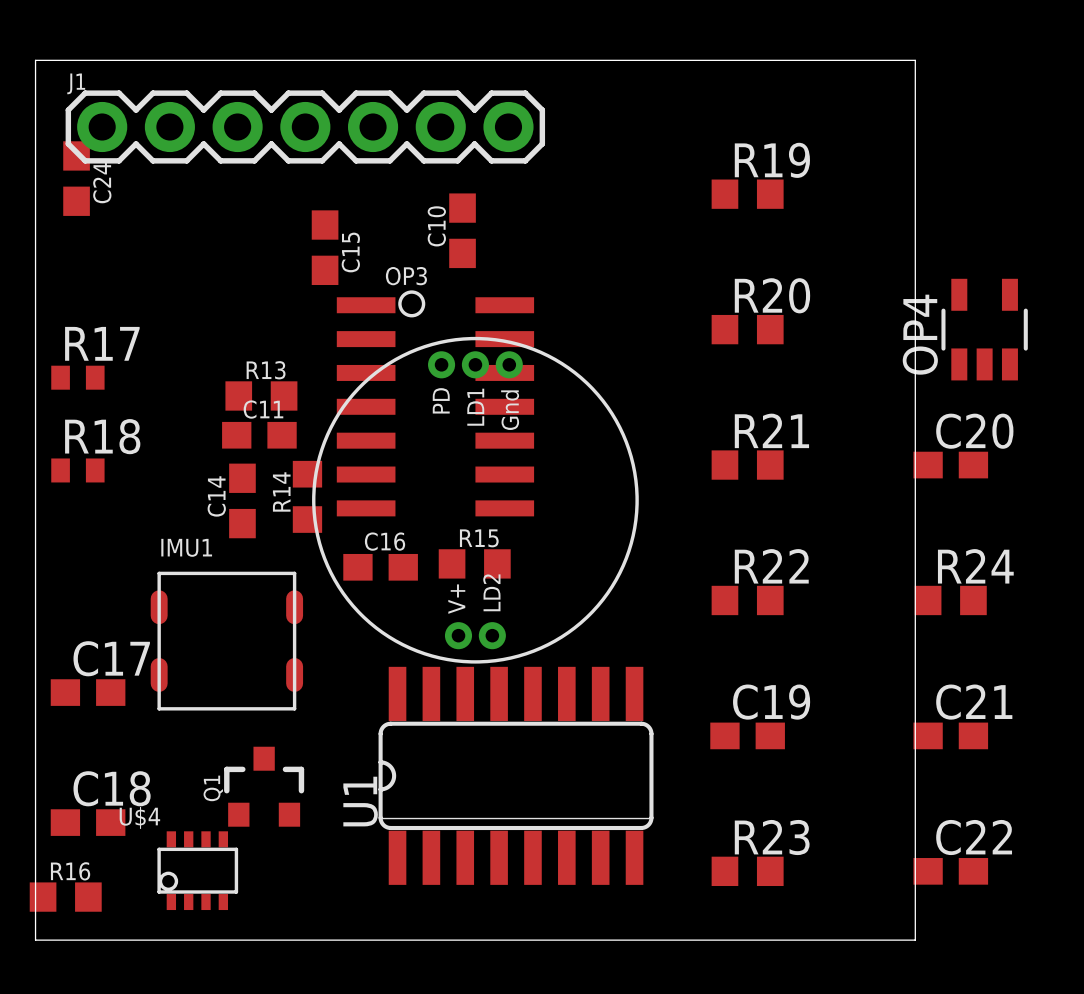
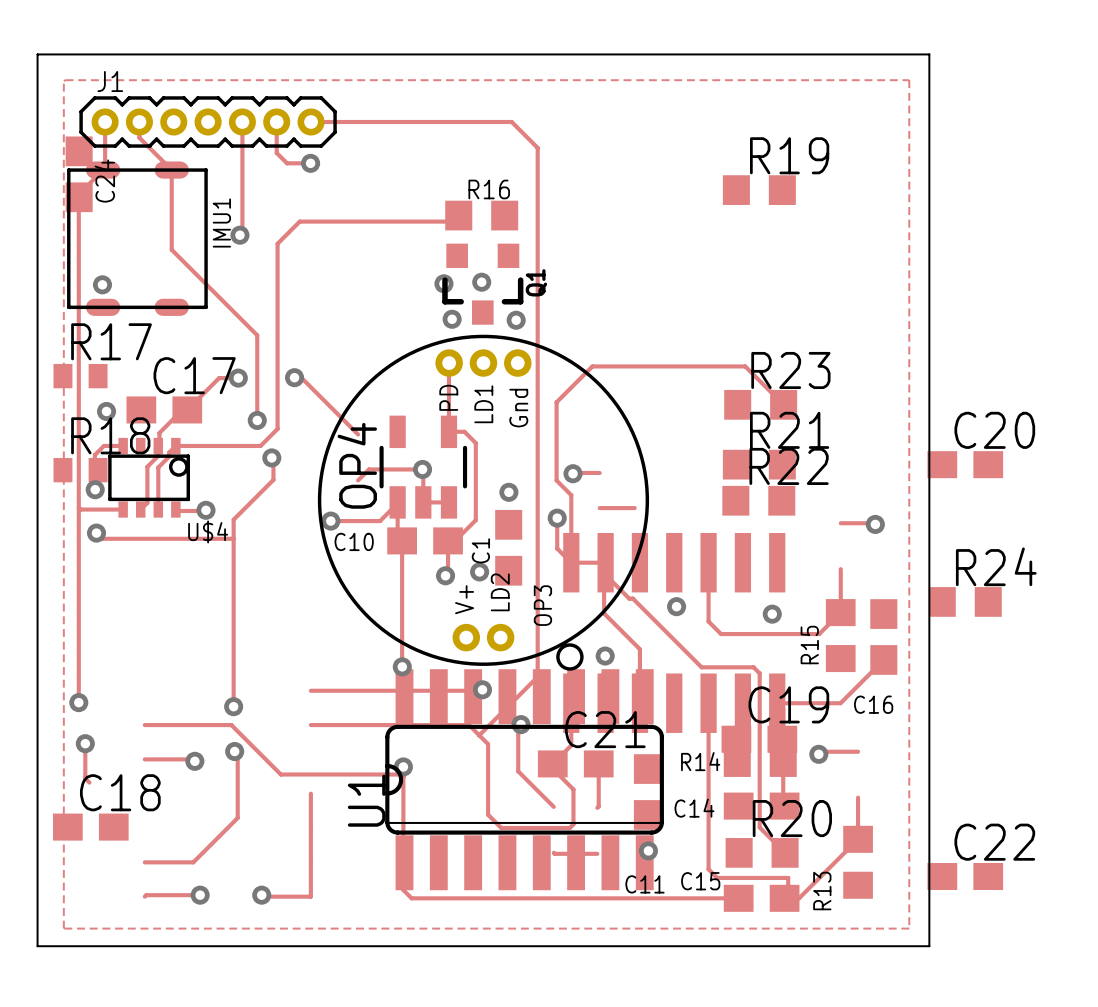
J1 name position: J1 (76, 83) -> J1 (110, 81)
zone outline: none -> (65, 80) (909, 80) (909, 928) (63, 928) (63, 80) (65, 80)
J1 footprint: [65, 90, 546, 164] -> [79, 96, 337, 148]
track: none -> (105, 122) (105, 168) (78, 194) (78, 702)
track: none -> (139, 122) (139, 137) (171, 170) (171, 249) (257, 335) (257, 420)
track: none -> (242, 122) (242, 232) (239, 235)
track: none -> (276, 122) (276, 153) (287, 163) (310, 163)
track: none -> (311, 122) (511, 122) (537, 147) (537, 676) (479, 735)
via: none -> (310, 163)
track: none -> (458, 215) (452, 221) (299, 221) (277, 243) (277, 428) (260, 445) (175, 445) (169, 452) (169, 456) (158, 467) (158, 509)
C10 rotation: 0° (462, 230) -> 90° clockwise (425, 540)
C10 position: (462, 230) -> (425, 540)
via: none -> (239, 235)
C15 rotation: 0° (325, 247) -> 90° clockwise (761, 898)
C15 position: (325, 247) -> (761, 898)
C15 name position: C15 (350, 252) -> C15 (700, 881)
via: none -> (481, 282)
via: none -> (443, 283)
via: none -> (102, 284)
via: none -> (452, 319)
via: none -> (516, 320)
R20 position: (747, 329) -> (762, 852)
OP4 position: (984, 329) -> (423, 467)
track: none -> (448, 363) (448, 431)
R13 name position: R13 (266, 370) -> R13 (822, 891)
track: none -> (238, 378) (219, 378) (187, 409) (182, 409) (159, 432) (158, 455) (147, 466) (147, 502) (140, 509)
via: none -> (238, 378)
track: none -> (294, 377) (301, 377) (358, 434)
via: none -> (294, 377)
R13 rotation: 0° (261, 395) -> 90° clockwise (858, 862)
R13 position: (261, 395) -> (858, 862)
OP3 rotation: 0° (435, 403) -> 90° counterclockwise (670, 632)
OP3 position: (435, 403) -> (670, 632)
track: none -> (783, 404) (745, 366) (592, 366) (556, 402) (556, 480) (571, 495) (571, 562)
C11 name position: C11 (263, 409) -> C11 (644, 884)
via: none -> (106, 411)
via: none -> (257, 420)
track: none -> (448, 431) (464, 431) (475, 443) (475, 520) (455, 540) (448, 540) (448, 573) (445, 575)
C11 rotation: 0° (259, 435) -> 90° clockwise (647, 792)
C11 position: (259, 435) -> (647, 792)
track: none -> (123, 445) (103, 445) (94, 455) (94, 489)
track: none -> (271, 457) (273, 459) (273, 479) (233, 519) (233, 706)
via: none -> (271, 457)
via: none -> (422, 469)
via: none -> (573, 473)
track: none -> (599, 472) (573, 473)
track: none -> (358, 480) (369, 469) (422, 469) (423, 502) (448, 502)
via: none -> (95, 489)
via: none -> (508, 492)
R14 rotation: 0° (307, 496) -> 90° clockwise (760, 762)
R14 position: (307, 496) -> (760, 762)
C14 rotation: 0° (242, 500) -> 90° clockwise (761, 806)
C14 position: (242, 500) -> (761, 806)
track: none -> (397, 502) (397, 536) (402, 540) (402, 666)
track: none -> (397, 503) (380, 521) (330, 521)
track: none -> (78, 507) (80, 509) (123, 509)
track: none -> (599, 508) (634, 508)
track: none -> (175, 509) (205, 510)
via: none -> (205, 510)
track: none -> (557, 518) (557, 548) (571, 562)
via: none -> (557, 518)
via: none -> (330, 521)
track: none -> (840, 523) (875, 524)
via: none -> (875, 524)
track: none -> (96, 533) (102, 538) (233, 538)
via: none -> (96, 533)
C16 name position: C16 (385, 541) -> C16 (873, 704)
C1: none -> (508, 547)
track: none -> (571, 562) (603, 562) (605, 565) (604, 613) (639, 649) (639, 703)
track: none -> (605, 562) (605, 574) (629, 598) (632, 598) (701, 667) (753, 667) (759, 673) (759, 827) (785, 852)
track: none -> (708, 562) (708, 621) (721, 634) (819, 634) (840, 612) (840, 569)
R15 rotation: 0° (474, 563) -> 90° clockwise (840, 635)
R15 position: (474, 563) -> (840, 635)
C16 rotation: 0° (380, 567) -> 90° clockwise (883, 637)
C16 position: (380, 567) -> (883, 637)
via: none -> (479, 571)
via: none -> (445, 575)
R22 position: (747, 600) -> (758, 500)
via: none -> (676, 606)
via: none -> (772, 614)
IMU1 rotation: 0° (226, 641) -> 90° clockwise (137, 238)
IMU1 position: (226, 641) -> (137, 238)
via: none -> (605, 656)
track: none -> (883, 659) (840, 703) (777, 703) (783, 709) (784, 806)
via: none -> (402, 666)
track: none -> (482, 689) (310, 690)
via: none -> (482, 689)
C17 position: (88, 692) -> (164, 409)
via: none -> (78, 702)
track: none -> (571, 703) (571, 745) (552, 763) (552, 768) (573, 789) (573, 824) (569, 827) (501, 827) (488, 814) (488, 744) (469, 725) (310, 725)
track: none -> (708, 703) (708, 869) (717, 877) (788, 877) (788, 894) (784, 898) (799, 898) (858, 839) (858, 797)
via: none -> (233, 706)
track: none -> (144, 725) (231, 725) (280, 774) (400, 774) (403, 777)
track: none -> (520, 724) (518, 727) (518, 771) (553, 806)
via: none -> (520, 724)
C21 position: (950, 735) -> (575, 763)
track: none -> (85, 743) (85, 778) (89, 782)
via: none -> (85, 743)
track: none -> (234, 751) (237, 754) (237, 818) (193, 862) (144, 862)
via: none -> (234, 751)
track: none -> (858, 751) (821, 751) (818, 754)
via: none -> (818, 754)
track: none -> (144, 759) (192, 759) (194, 761)
via: none -> (194, 761)
track: none -> (598, 763) (597, 807)
track: none -> (403, 766) (403, 890) (411, 898) (738, 898)
via: none -> (403, 766)
Q1 rotation: 0° (264, 786) -> 180° (482, 284)
Q1 position: (264, 786) -> (482, 284)
track: none -> (310, 793) (310, 896) (261, 895)
via: none -> (648, 850)
track: none -> (553, 852) (597, 853)
U$4 rotation: 0° (197, 870) -> 180° (149, 477)
U$4 position: (197, 870) -> (149, 477)
R23 position: (747, 871) -> (760, 404)
track: none -> (200, 895) (144, 896)
via: none -> (200, 895)
via: none -> (261, 895)
R16 position: (65, 897) -> (481, 215)

